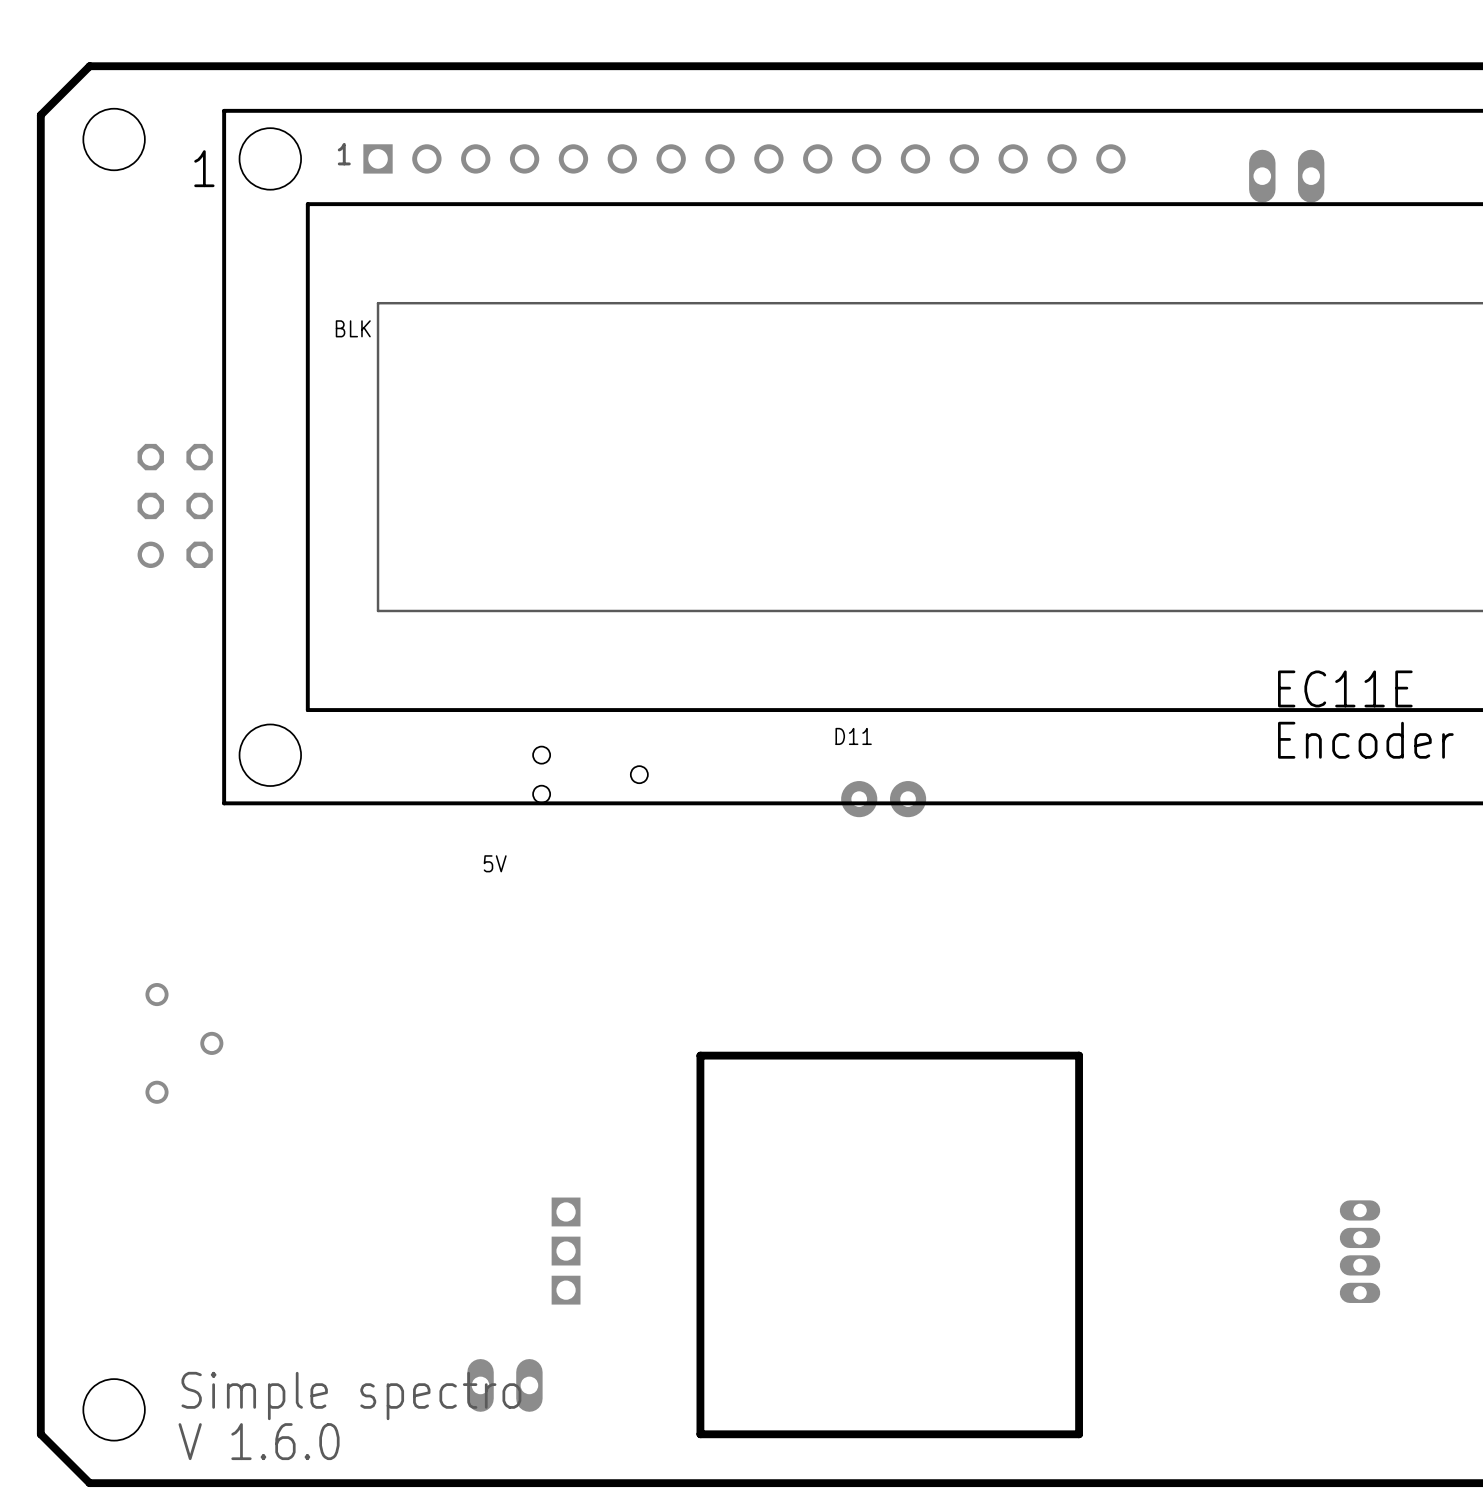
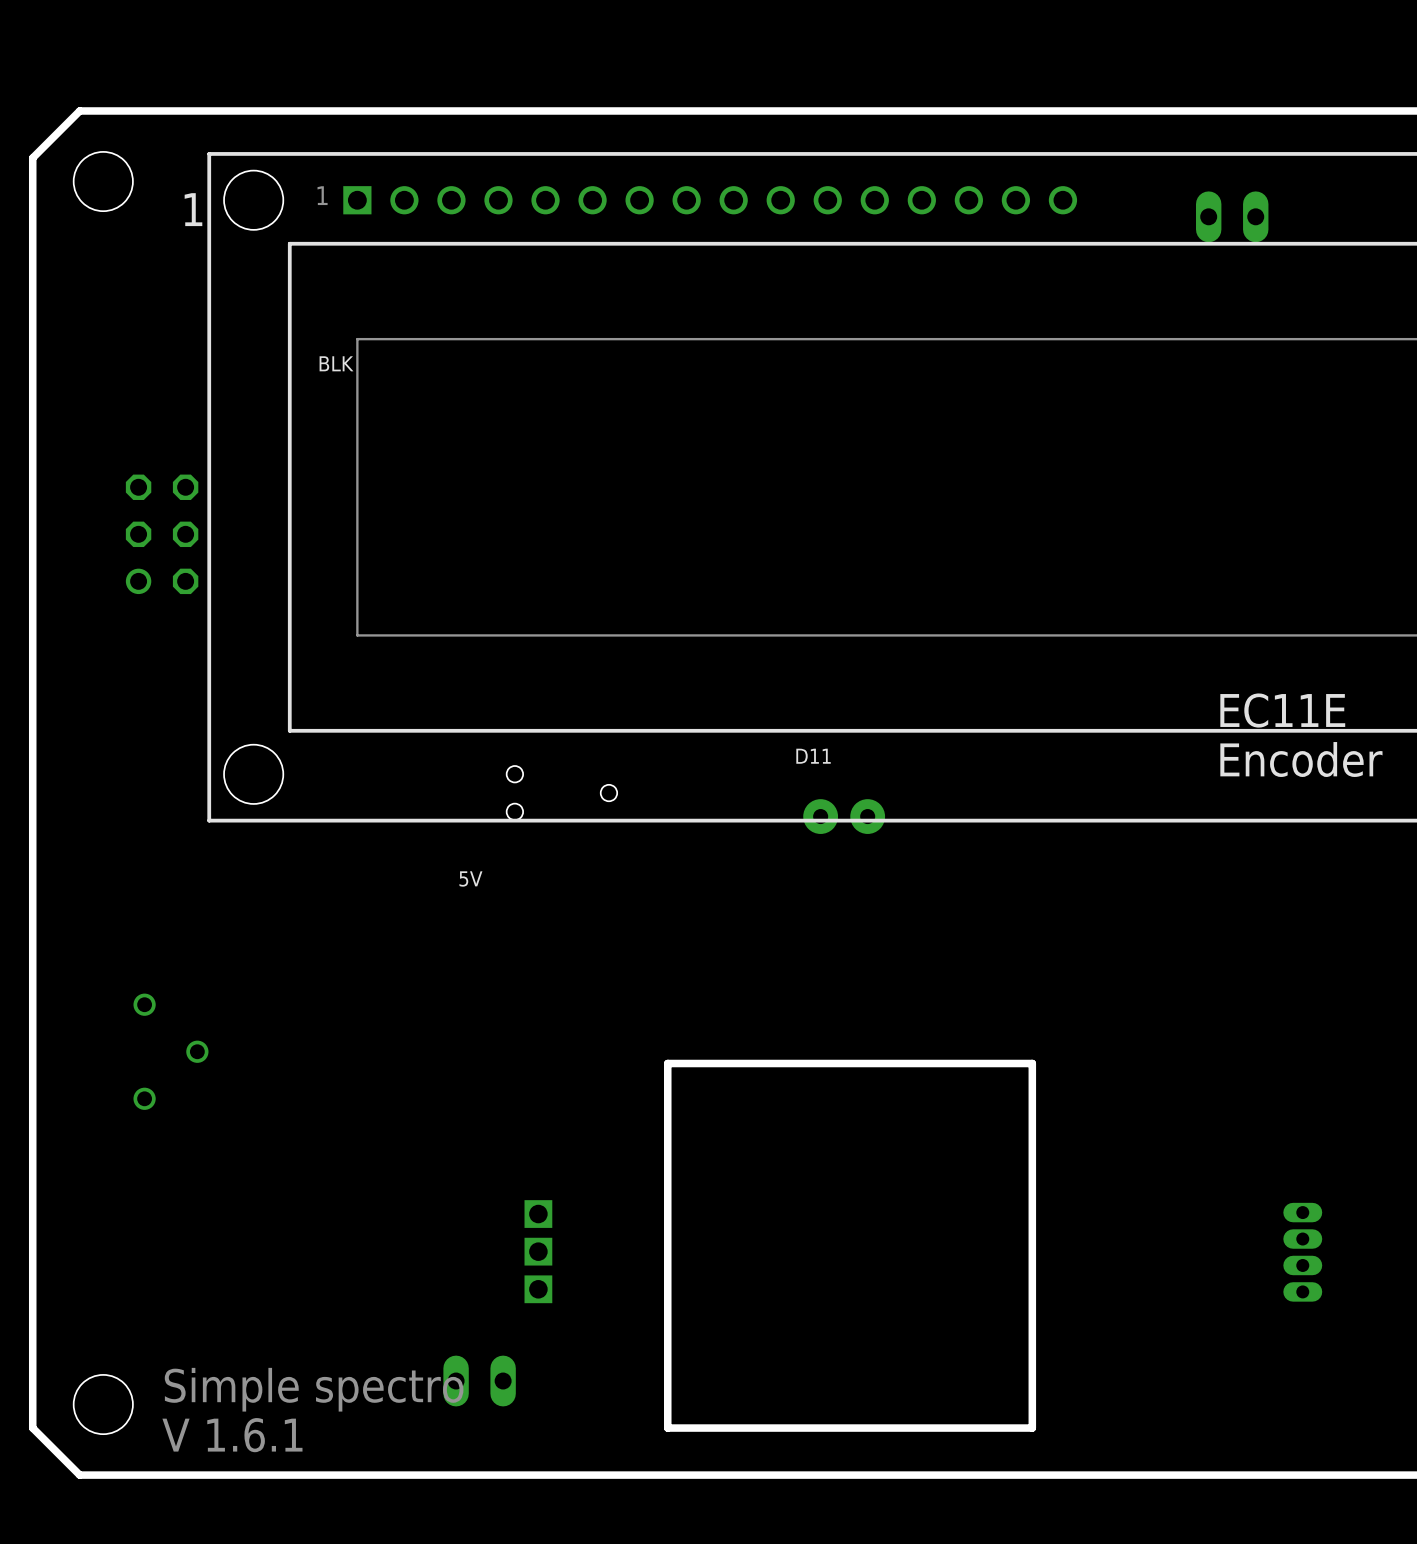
text: V 1.6.0 (259, 1441) -> V 1.6.1 (232, 1435)

